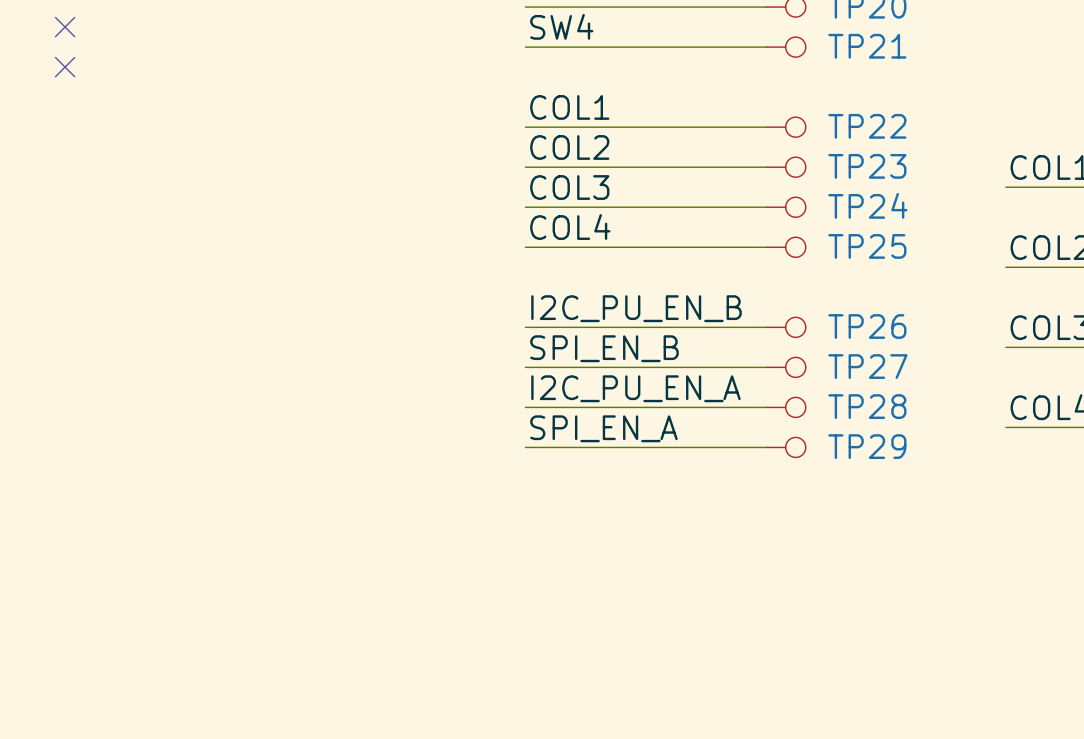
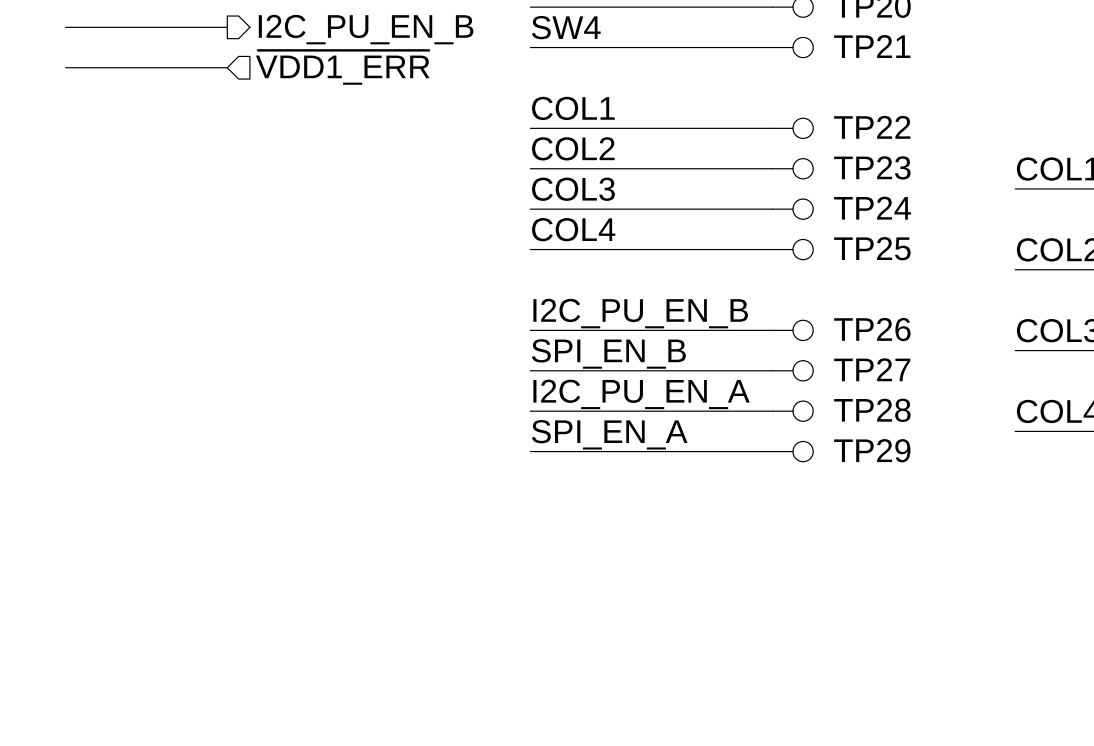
wire: none -> (65, 27) (227, 27)
no-connect mark: (65, 27) -> none
hierarchical label: none -> I2C_PU_EN_B (366, 29)
hierarchical label: none -> ~{VDD1_ERR} (342, 67)
wire: none -> (65, 67) (227, 67)
no-connect mark: (65, 67) -> none

